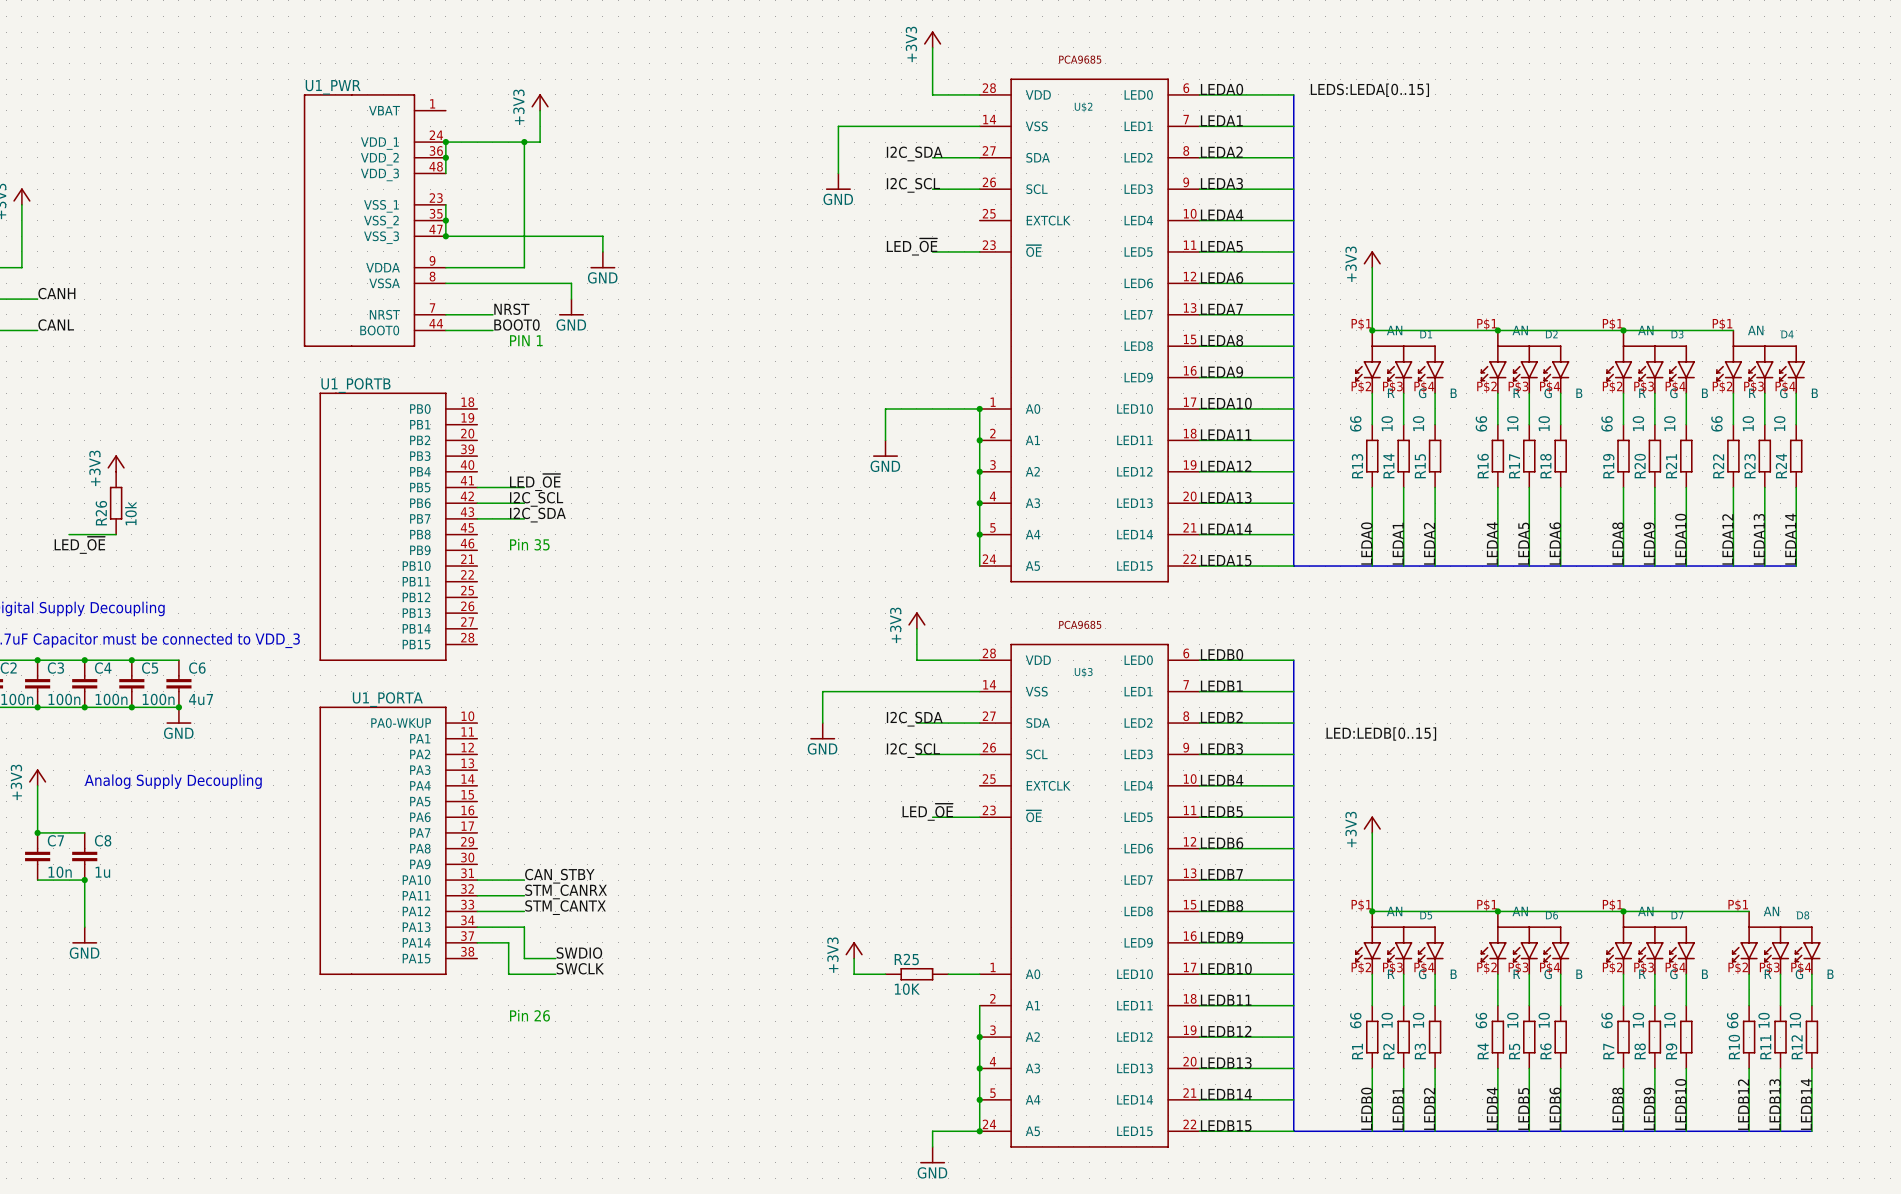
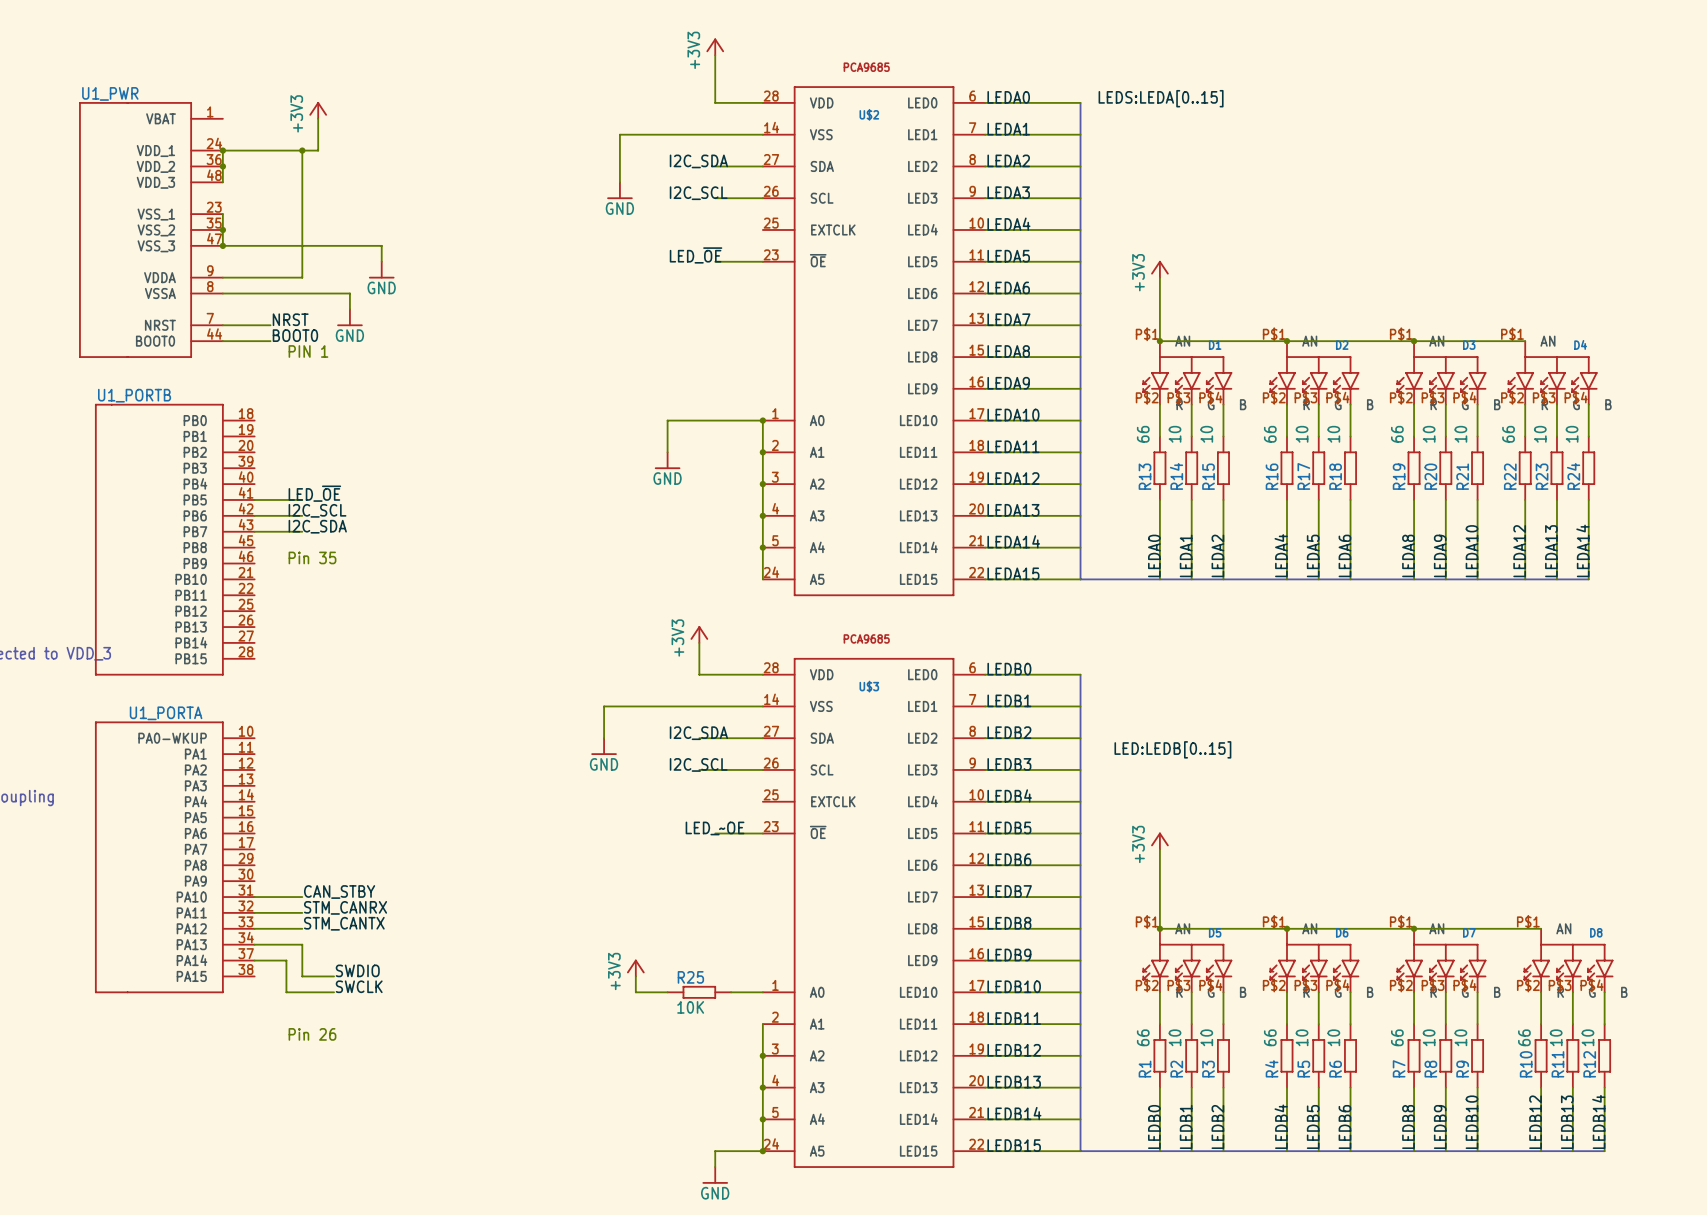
label: LED_~{OE} (927, 812) -> LED_~OE (715, 828)

